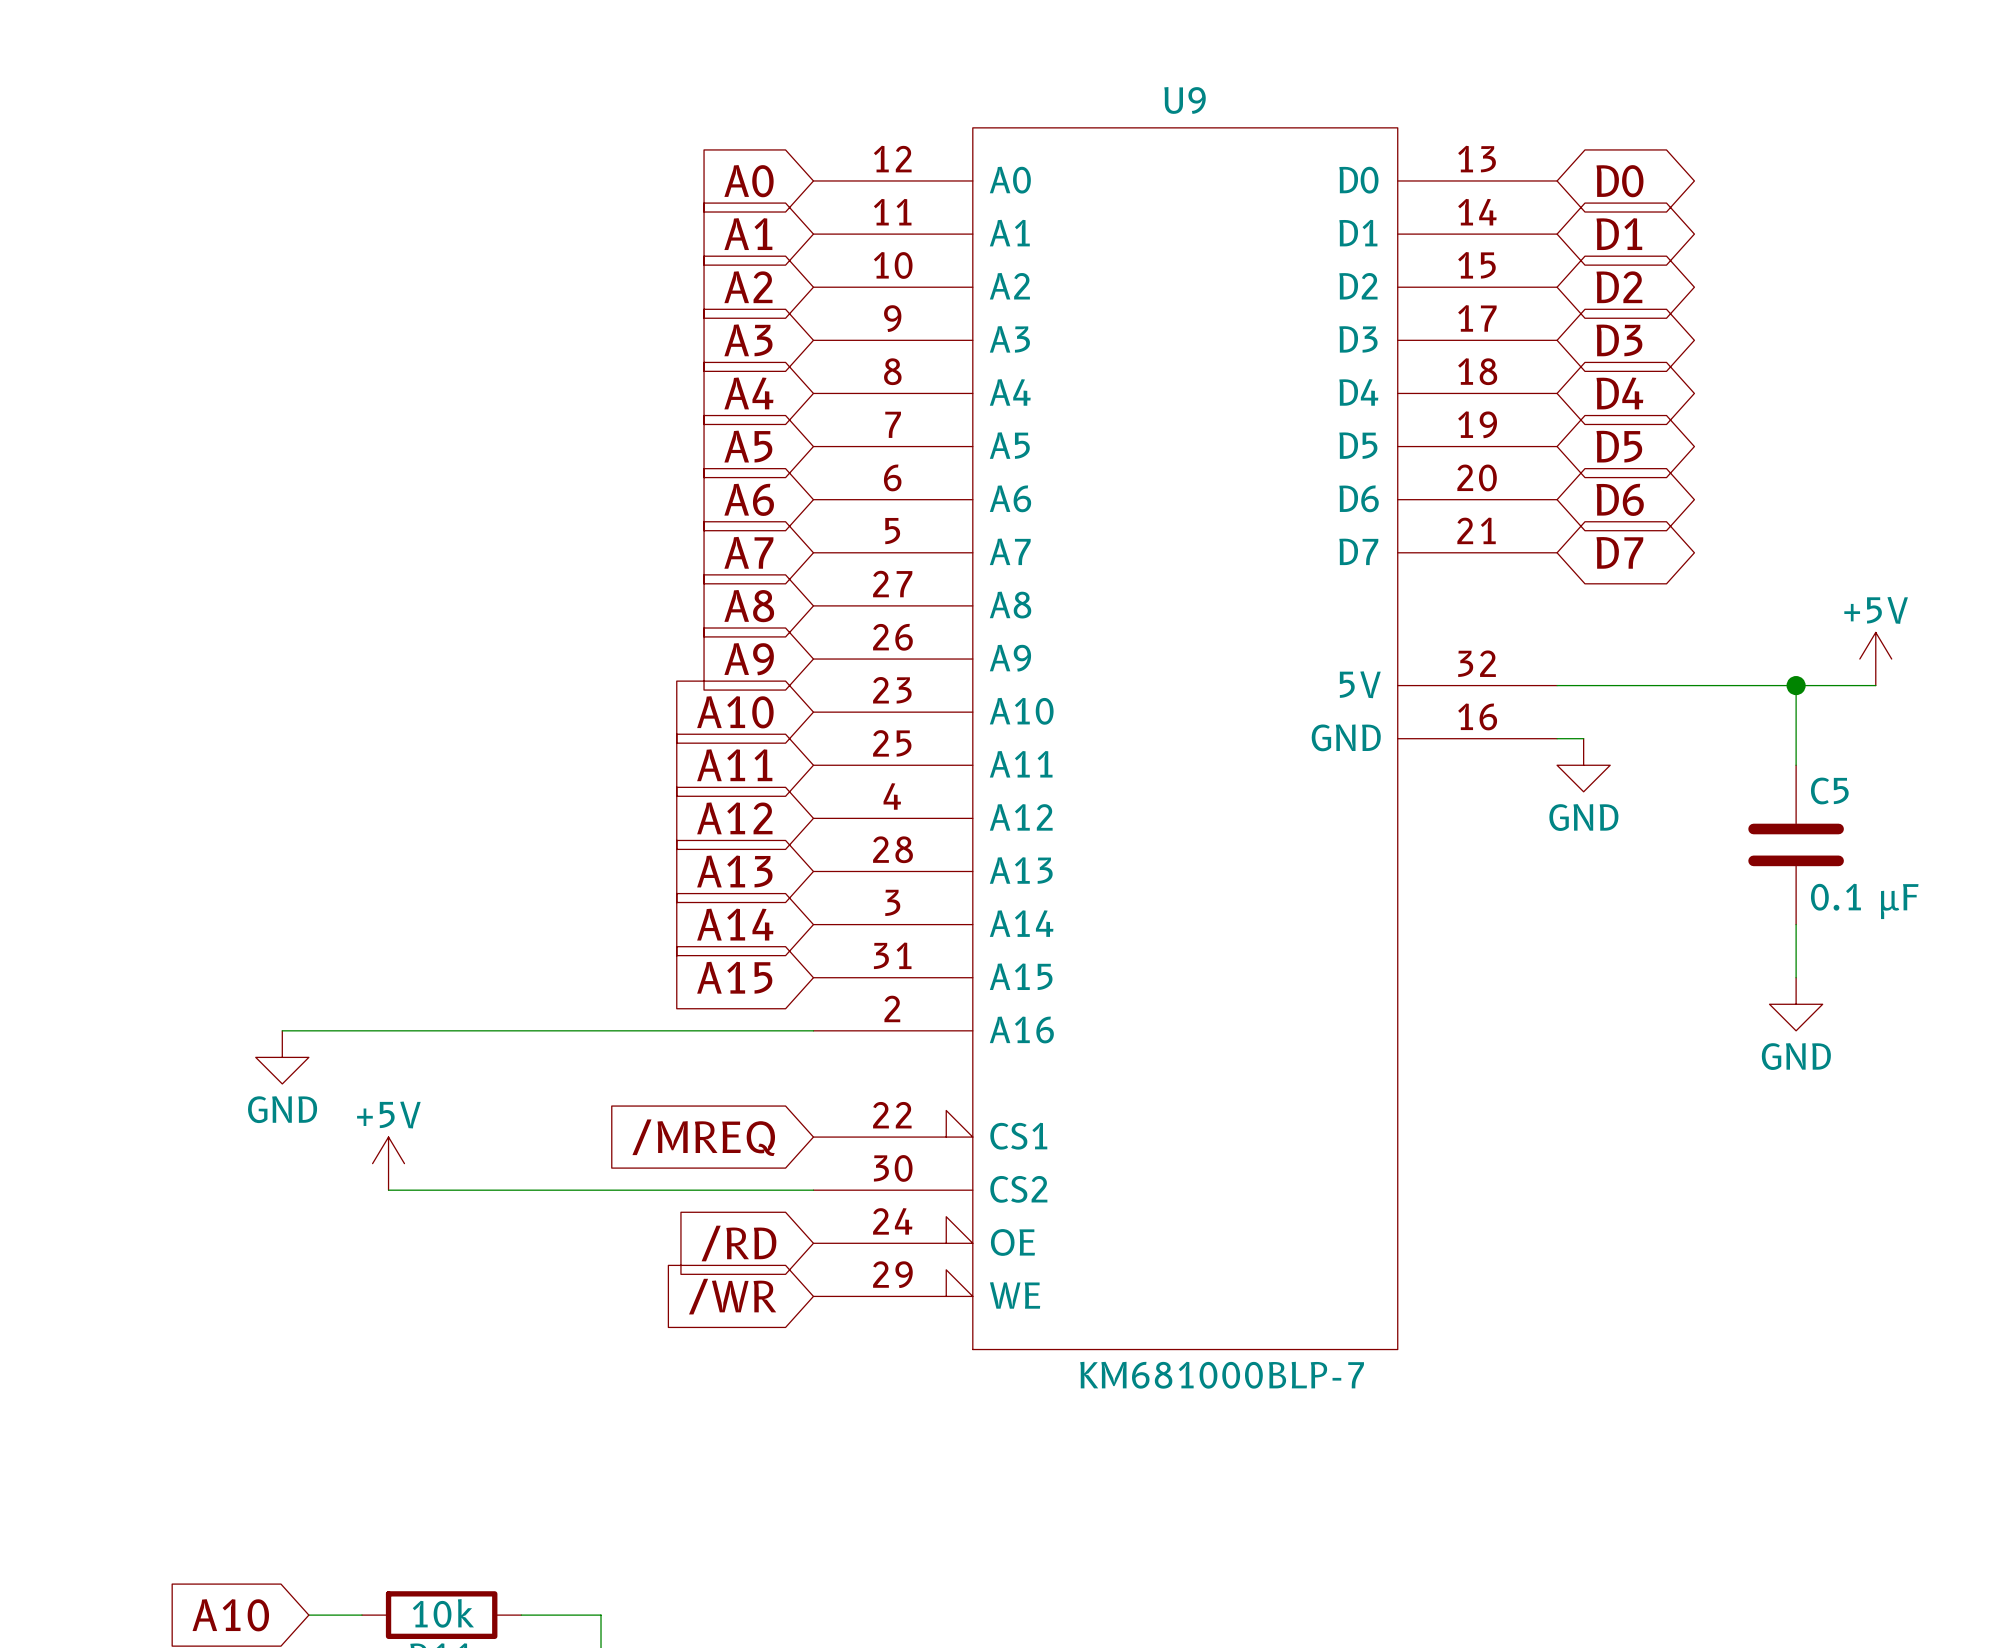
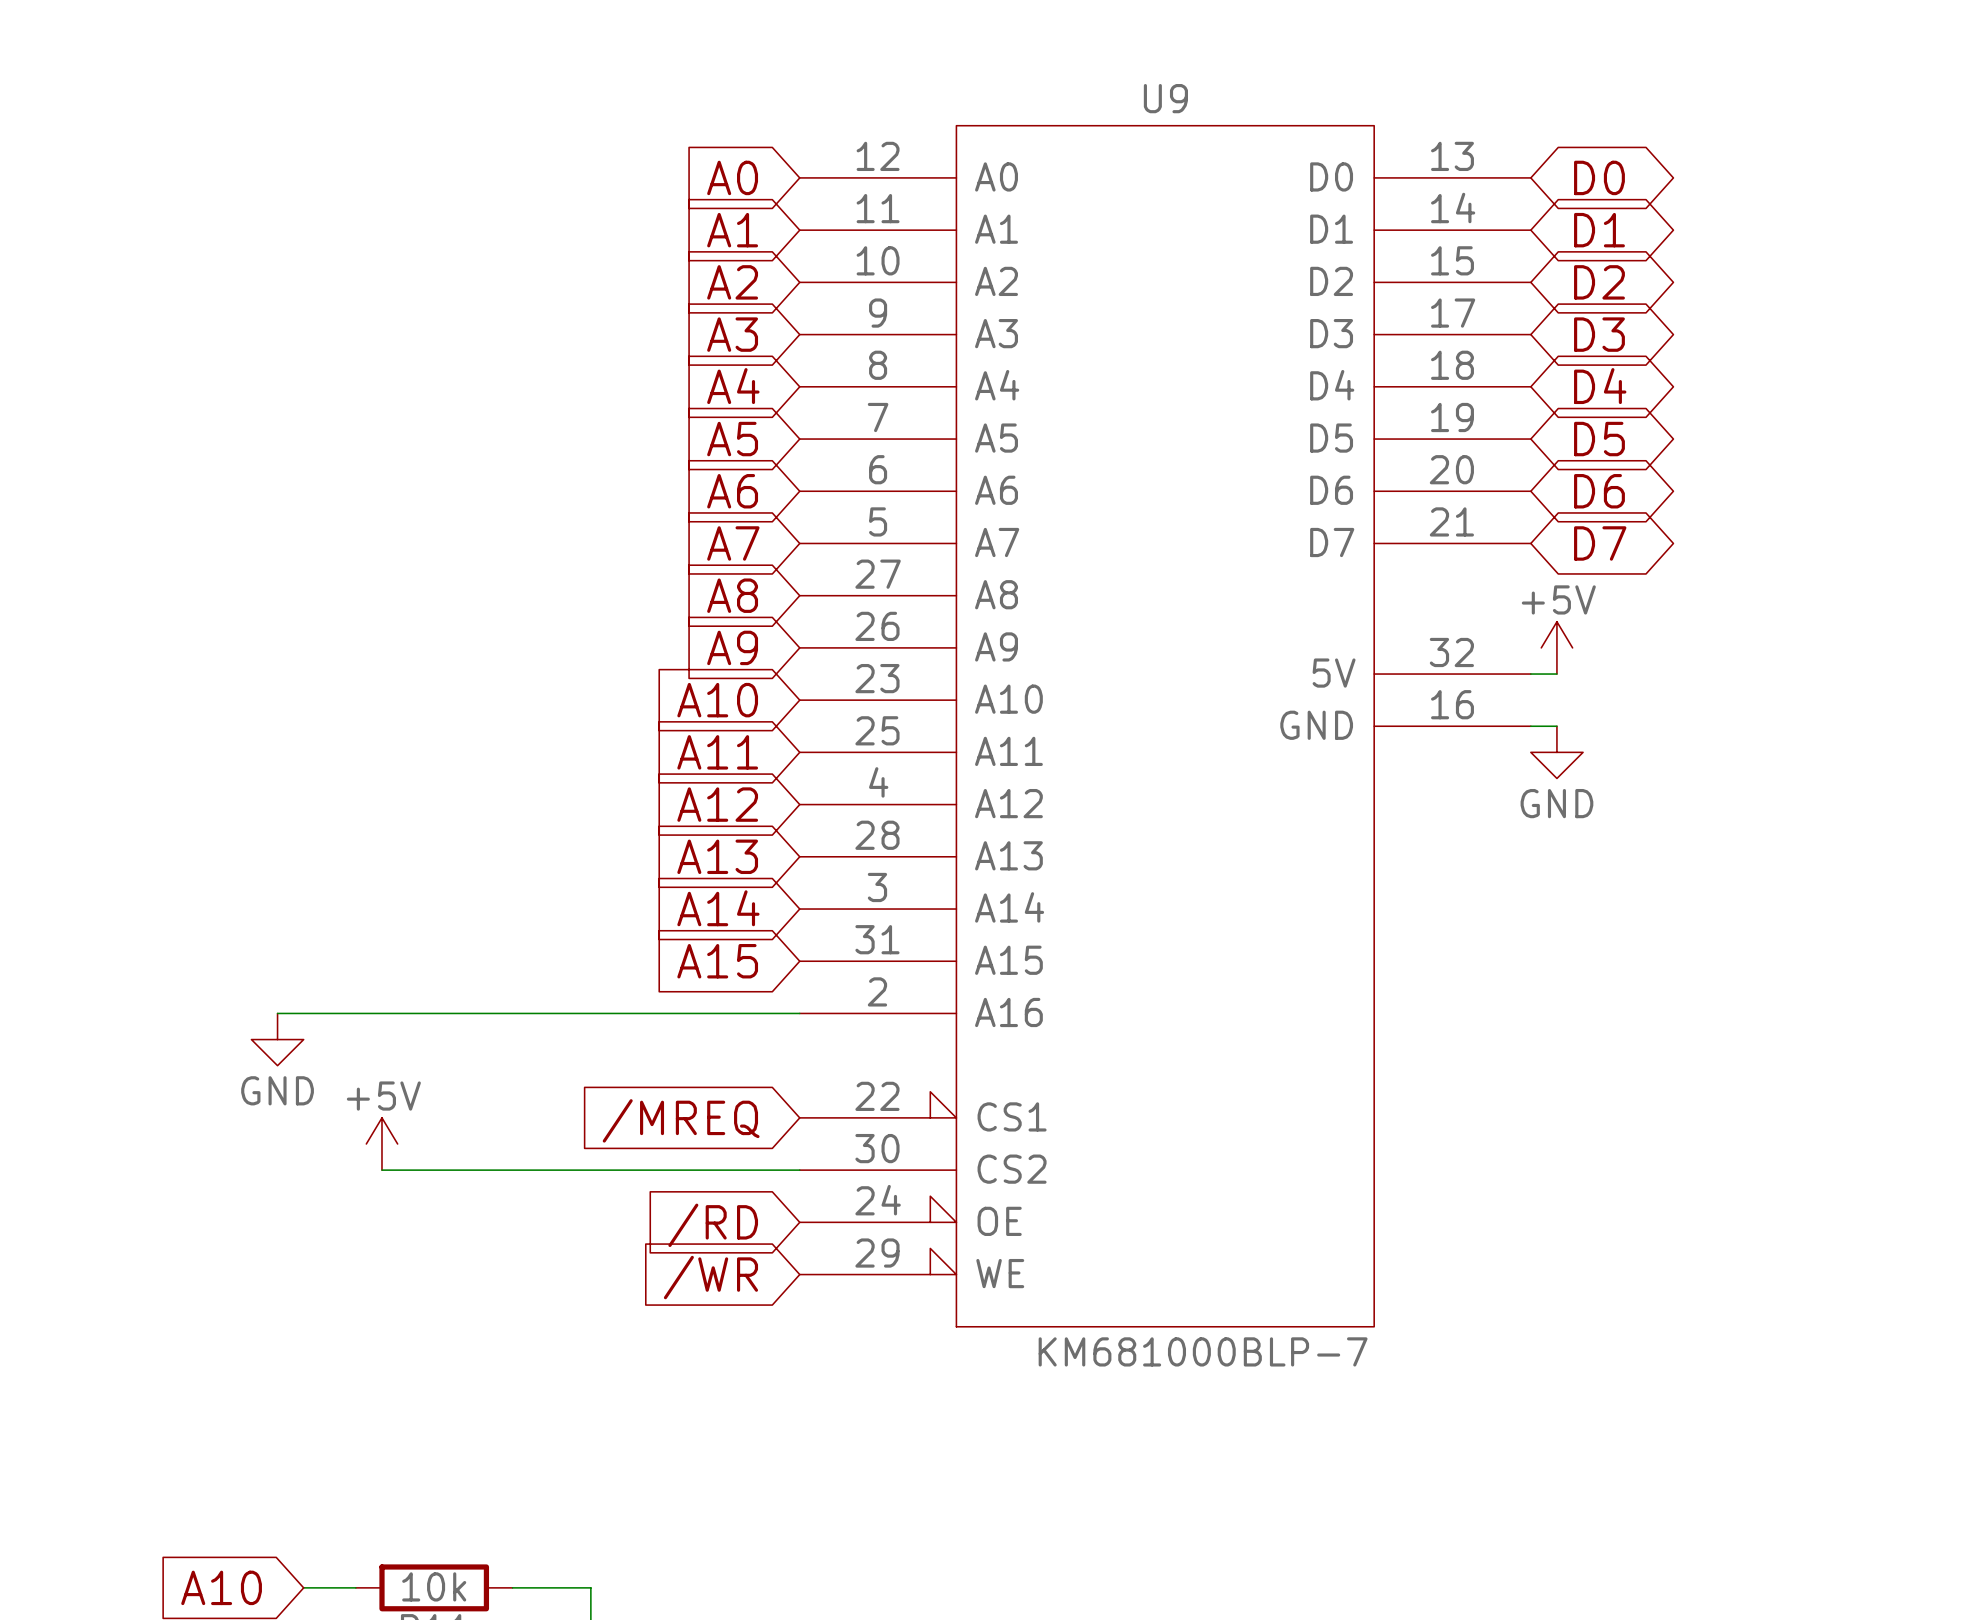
power symbol position: +5V (1875, 659) -> +5V (1556, 647)
wire: (1583, 685) (1875, 685) -> none
wire: (1796, 685) (1796, 765) -> none
junction: (1796, 685) -> none
C5: 0.1 µF (1796, 844) -> none
wire: (1796, 924) (1796, 977) -> none
power symbol: GND (1796, 1004) -> none

